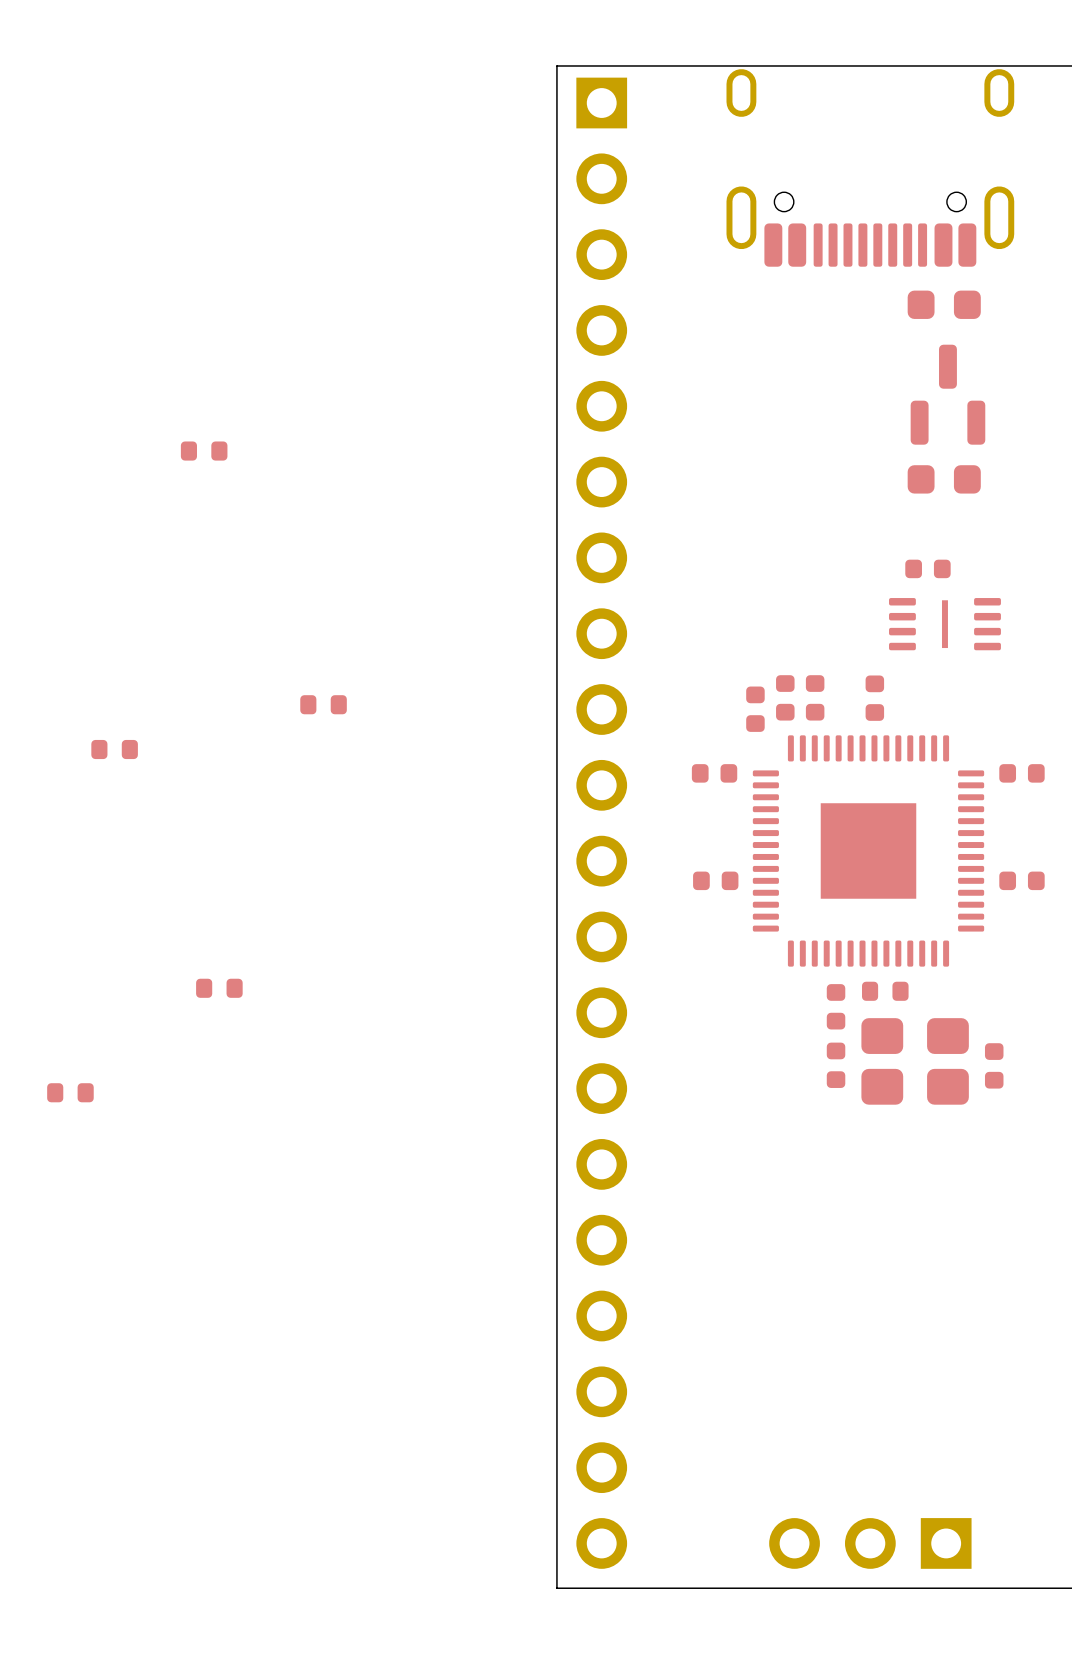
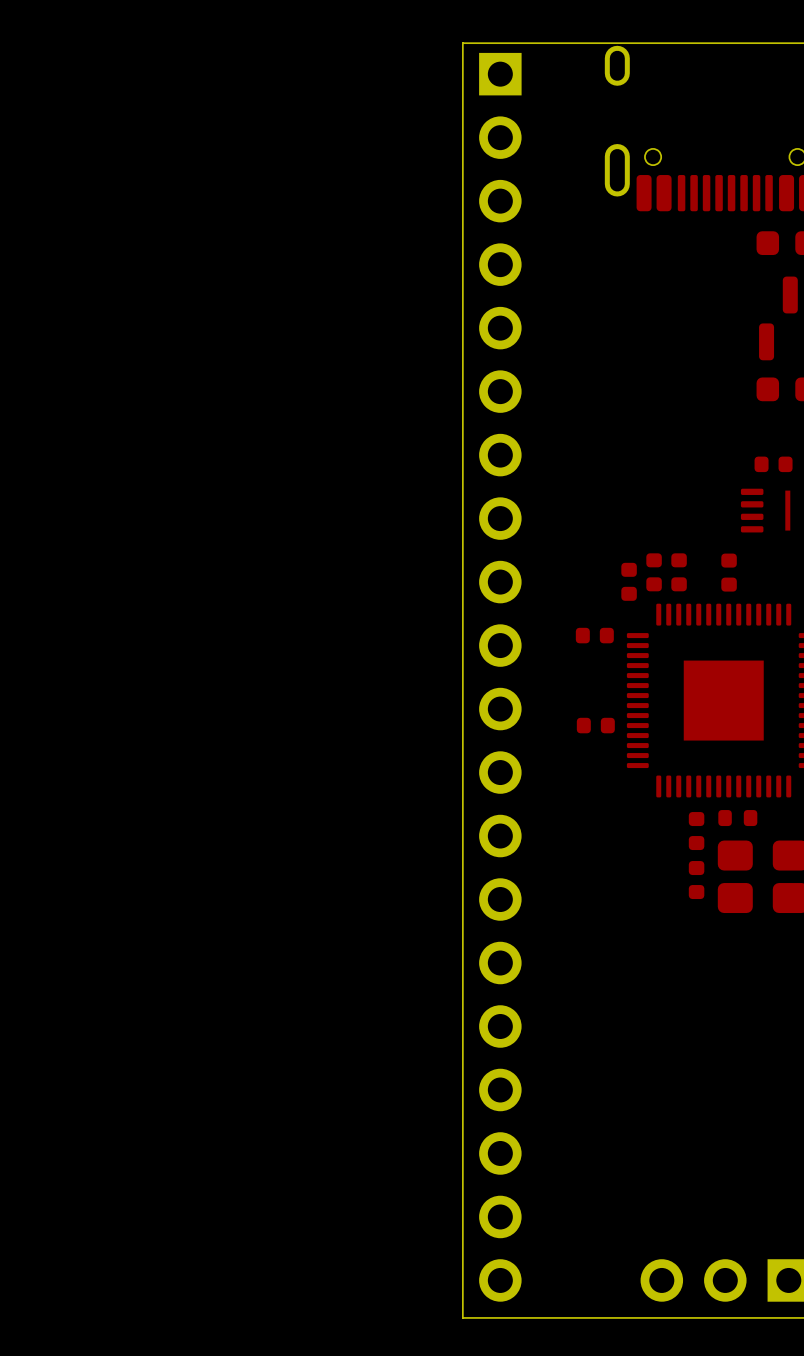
part: (204, 451) -> none
part: (323, 704) -> none
part: (114, 749) -> none
part: (219, 988) -> none
part: (70, 1092) -> none

